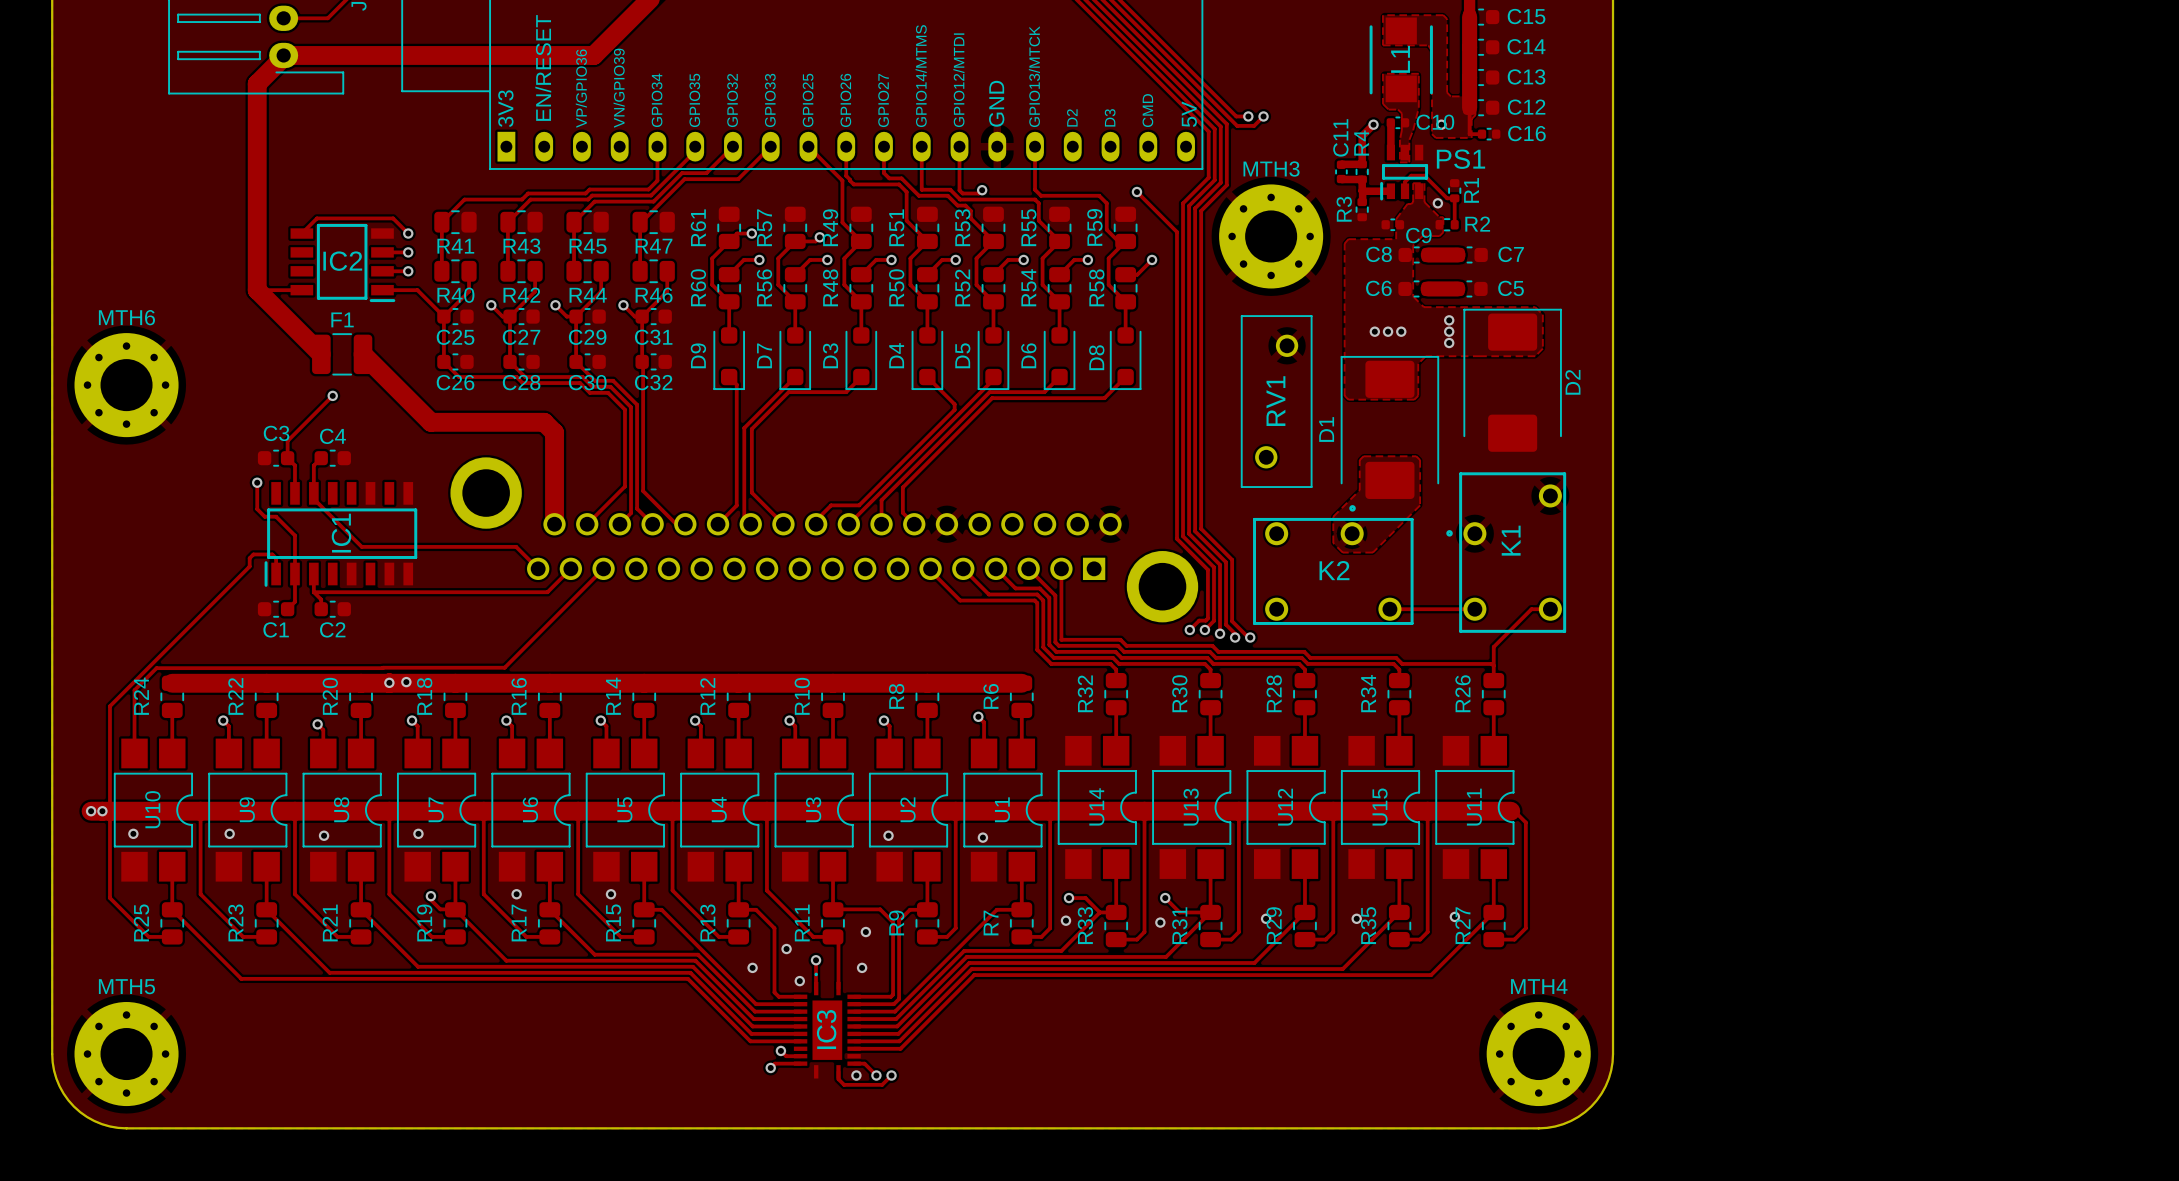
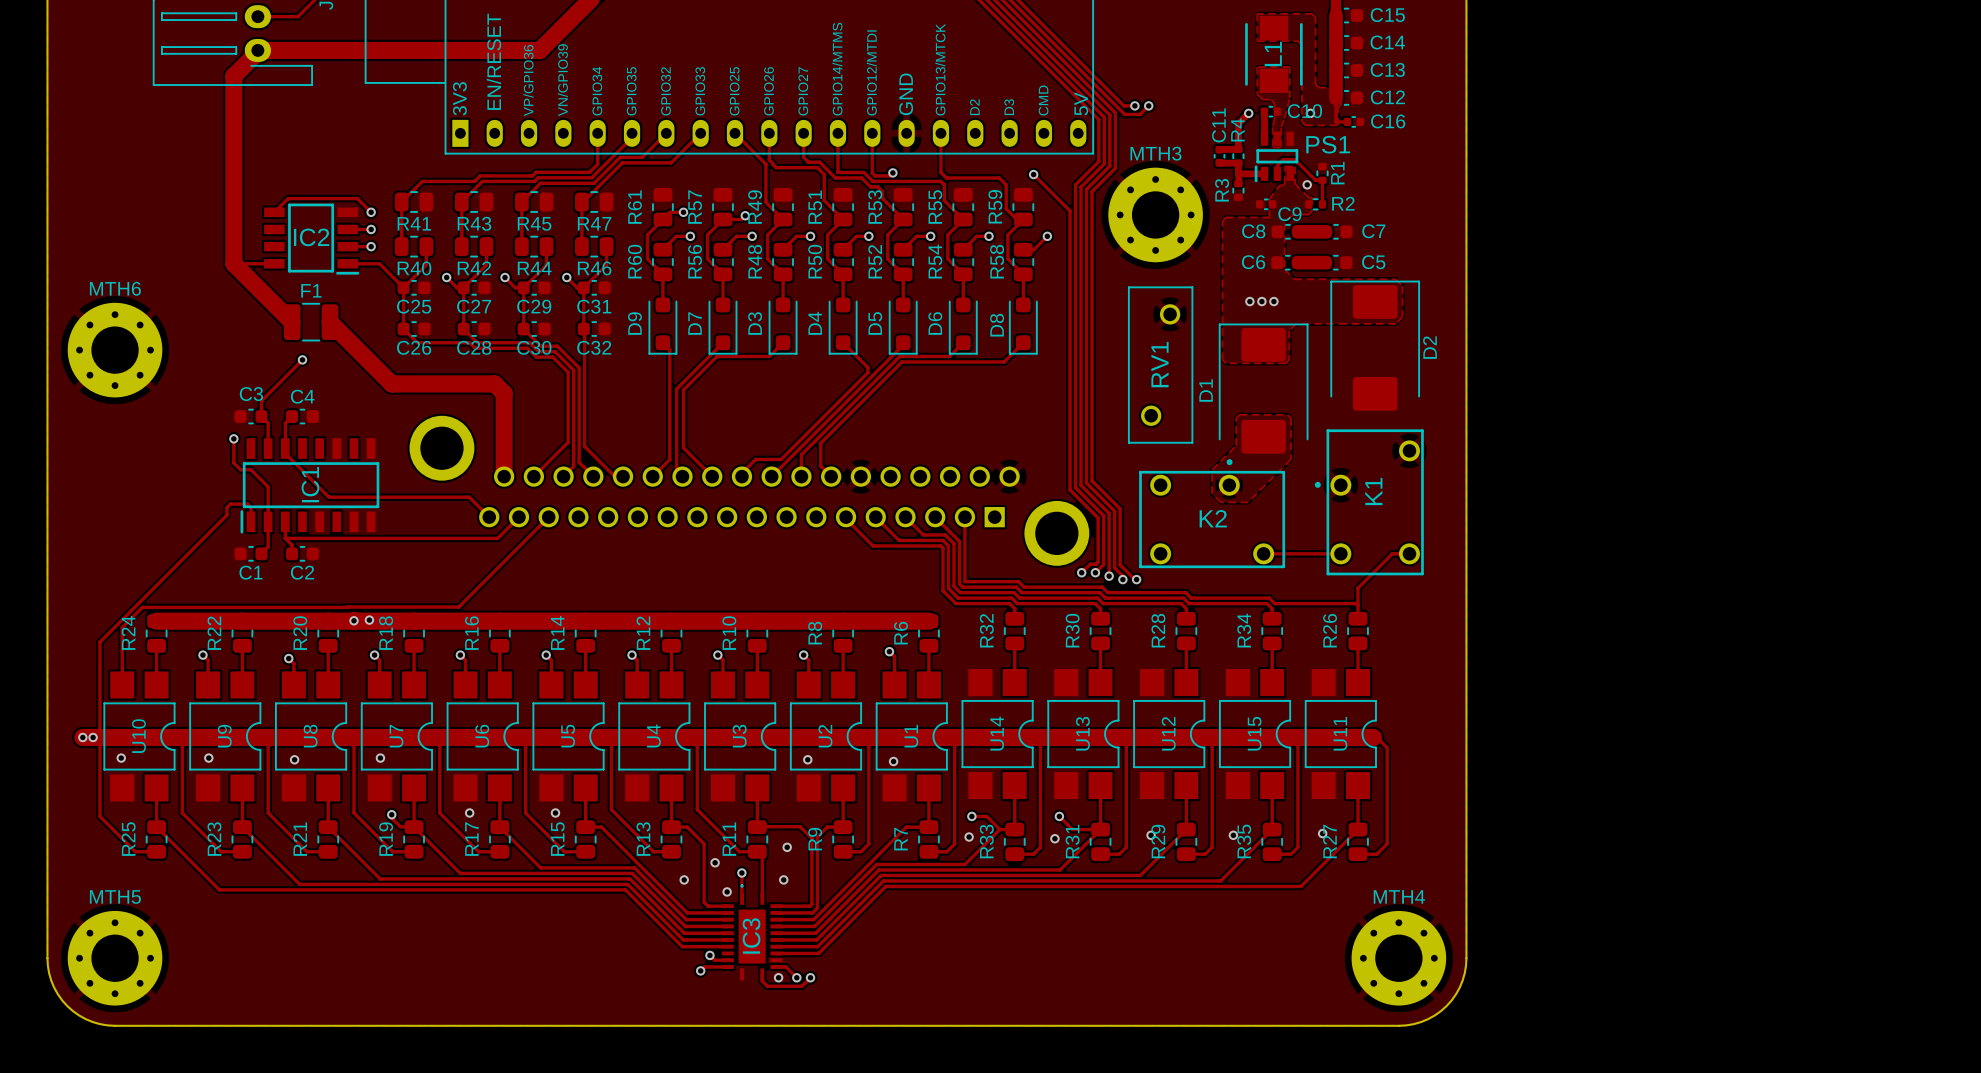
via: (1449, 320) -> none
via: (1449, 331) -> none
via: (1449, 343) -> none

